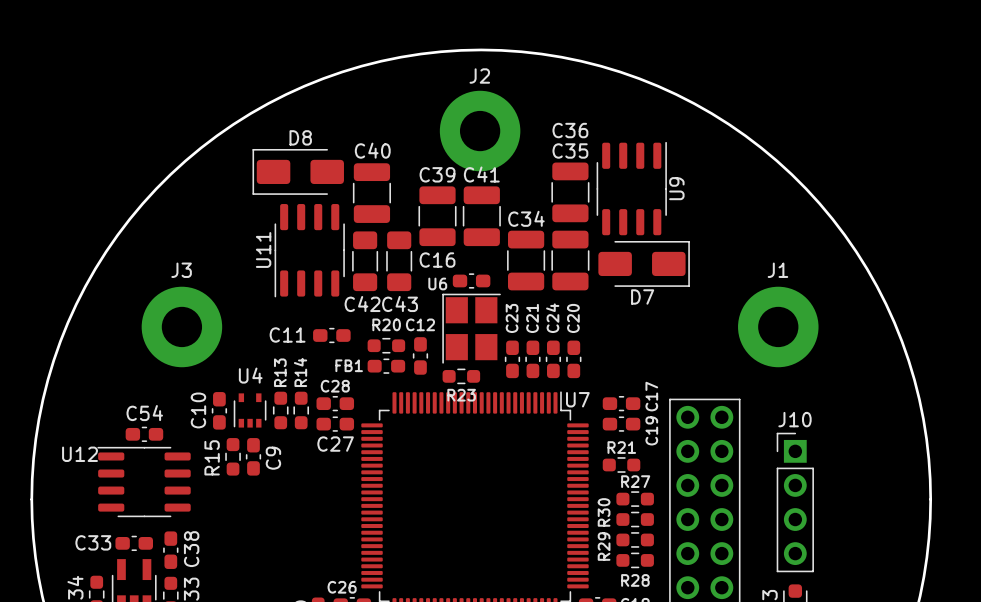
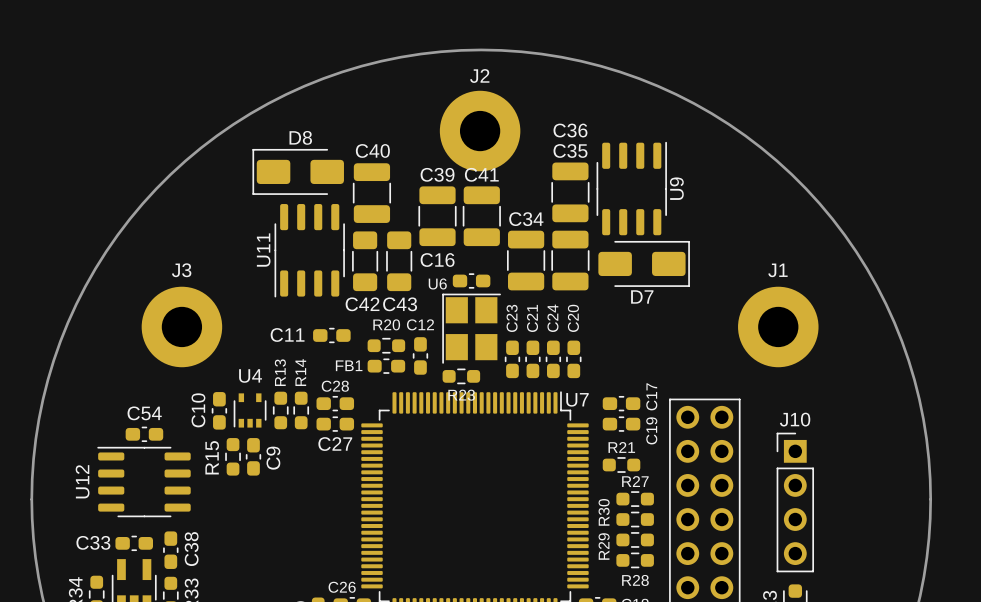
U12 name rotation: 0° (80, 454) -> 90° counterclockwise (82, 481)

